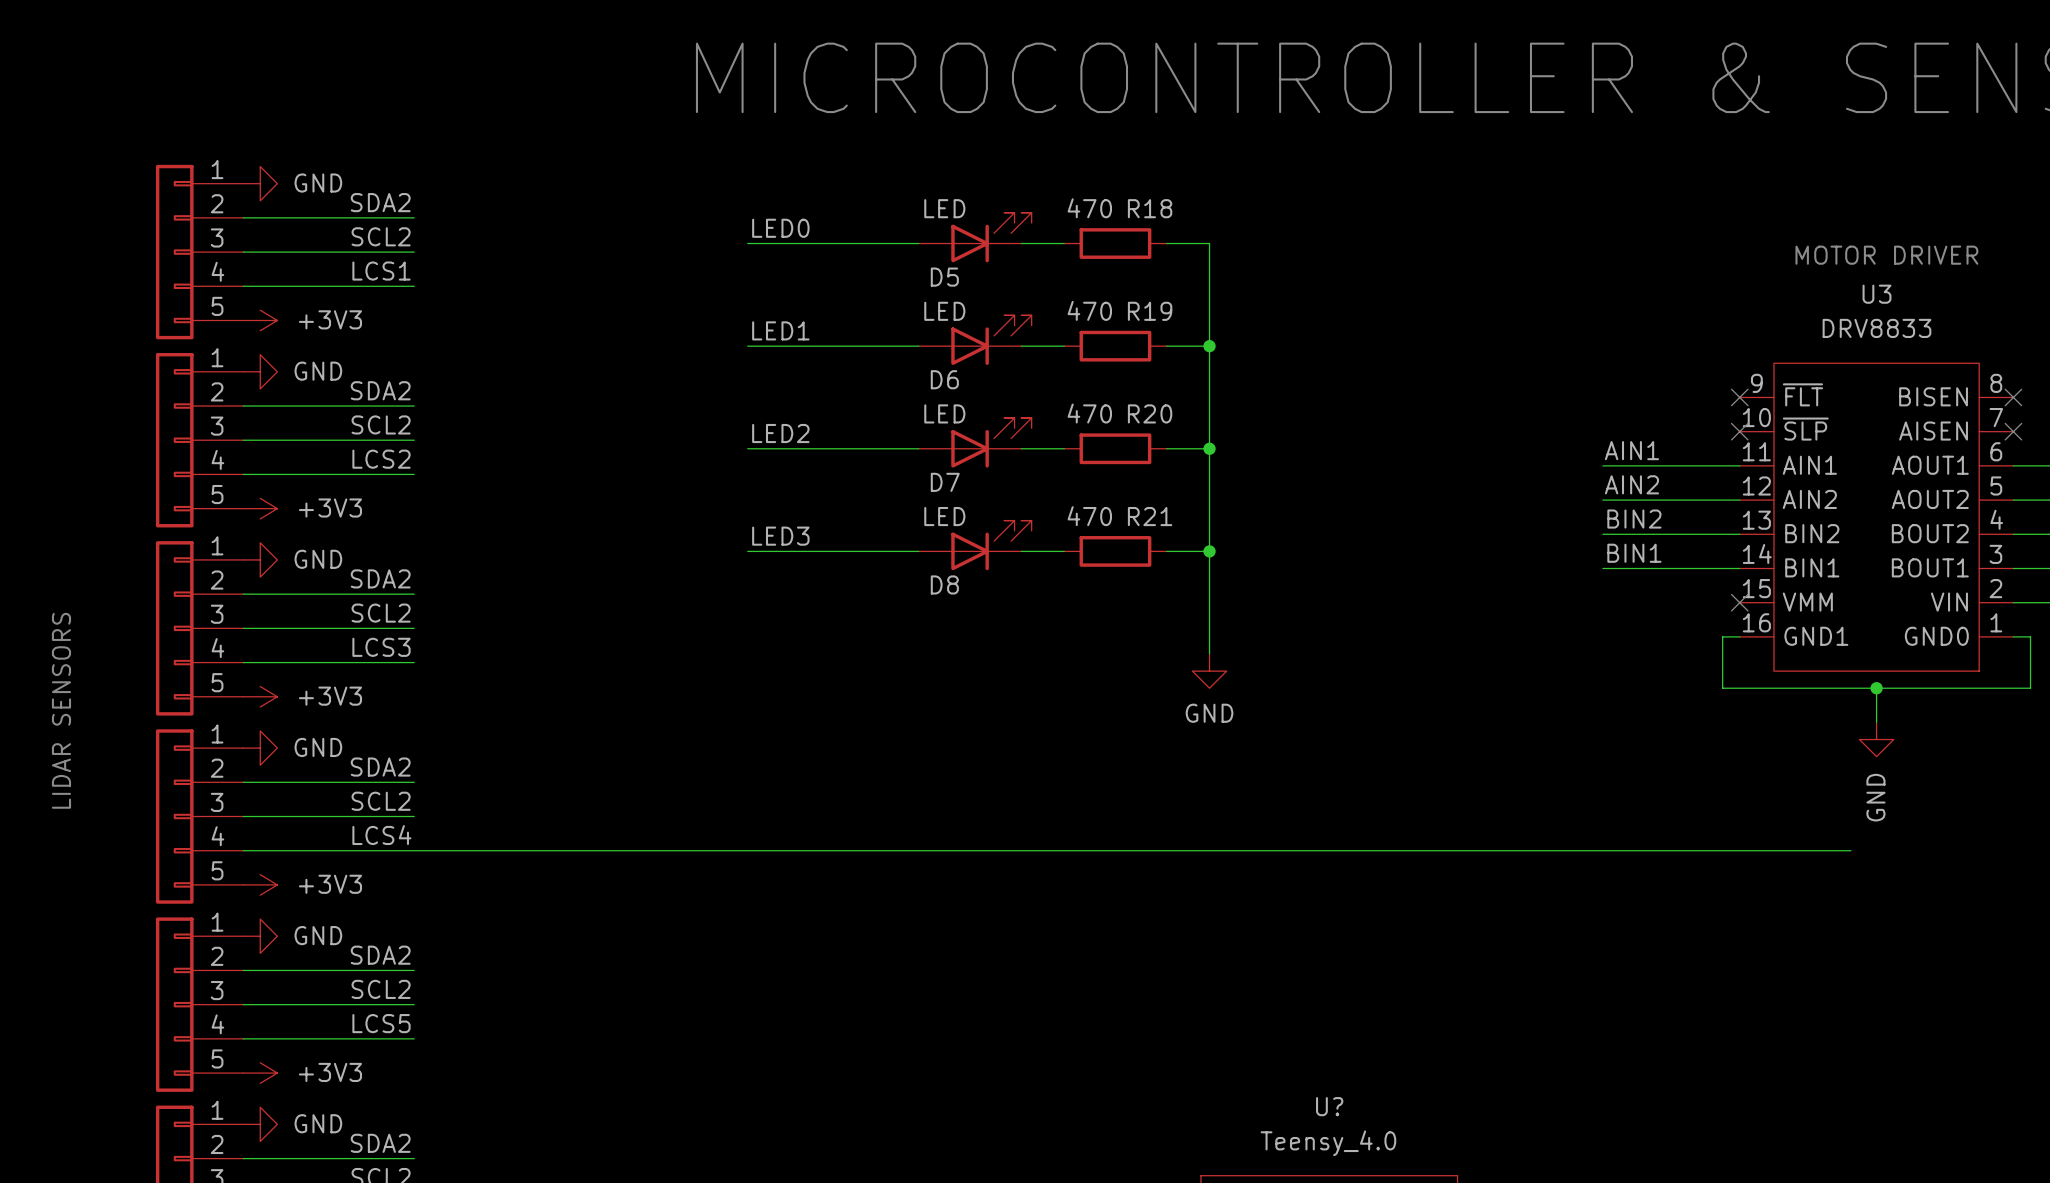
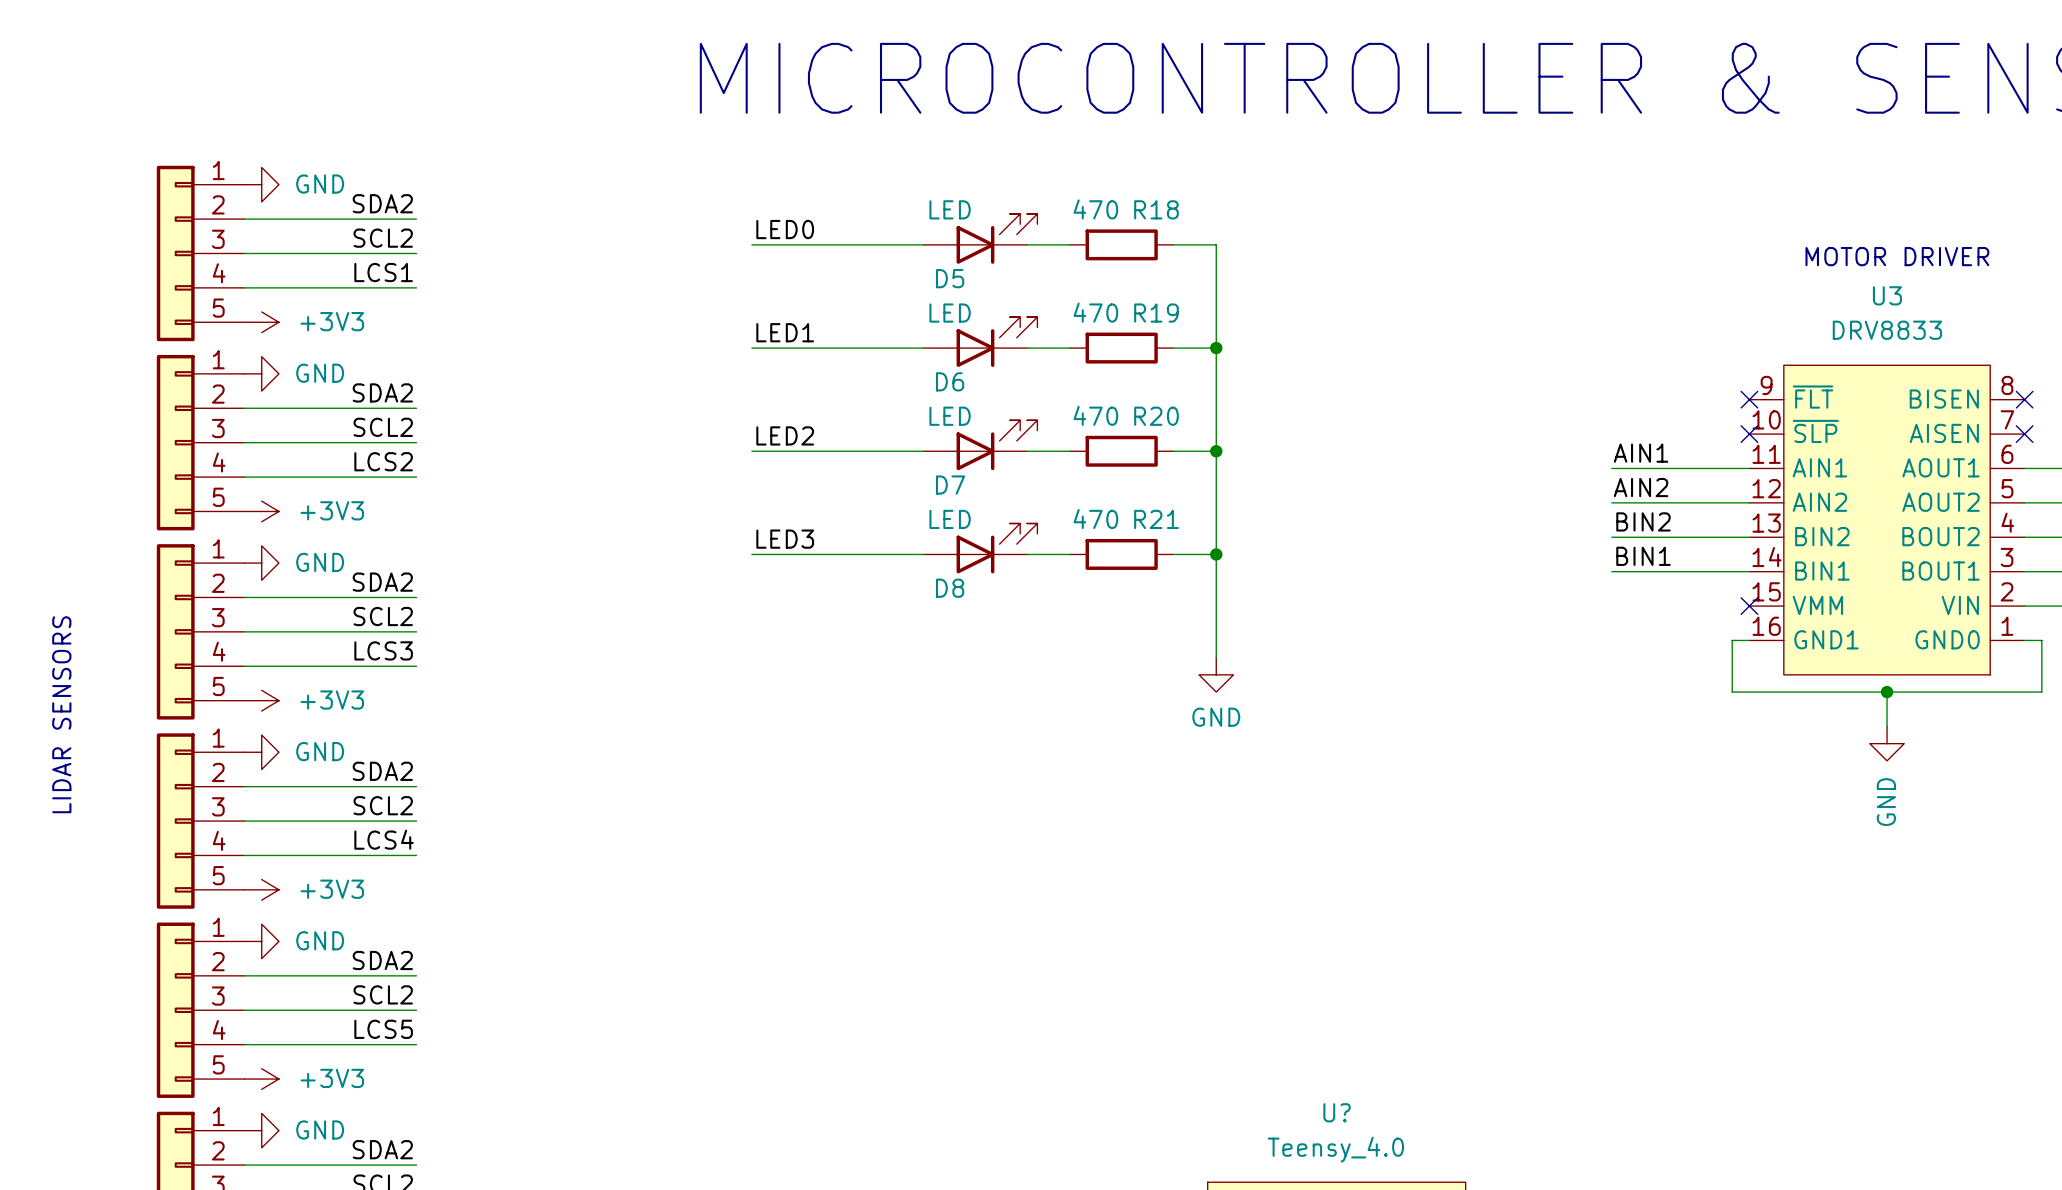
wire: (414, 850) (1850, 850) -> none

